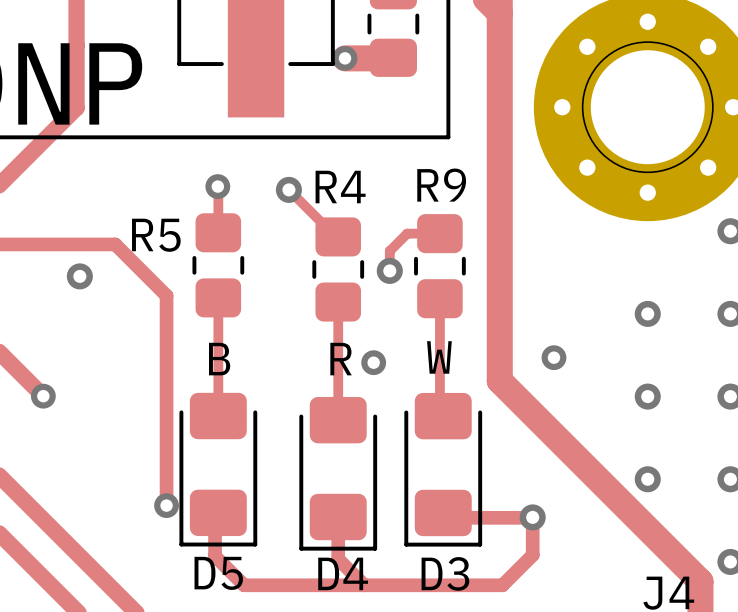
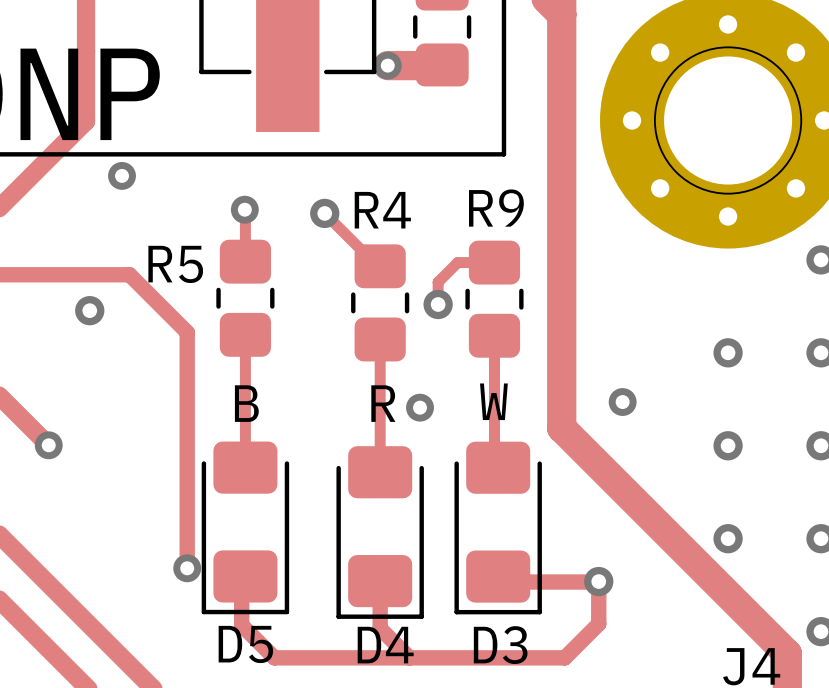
via: none -> (122, 175)

